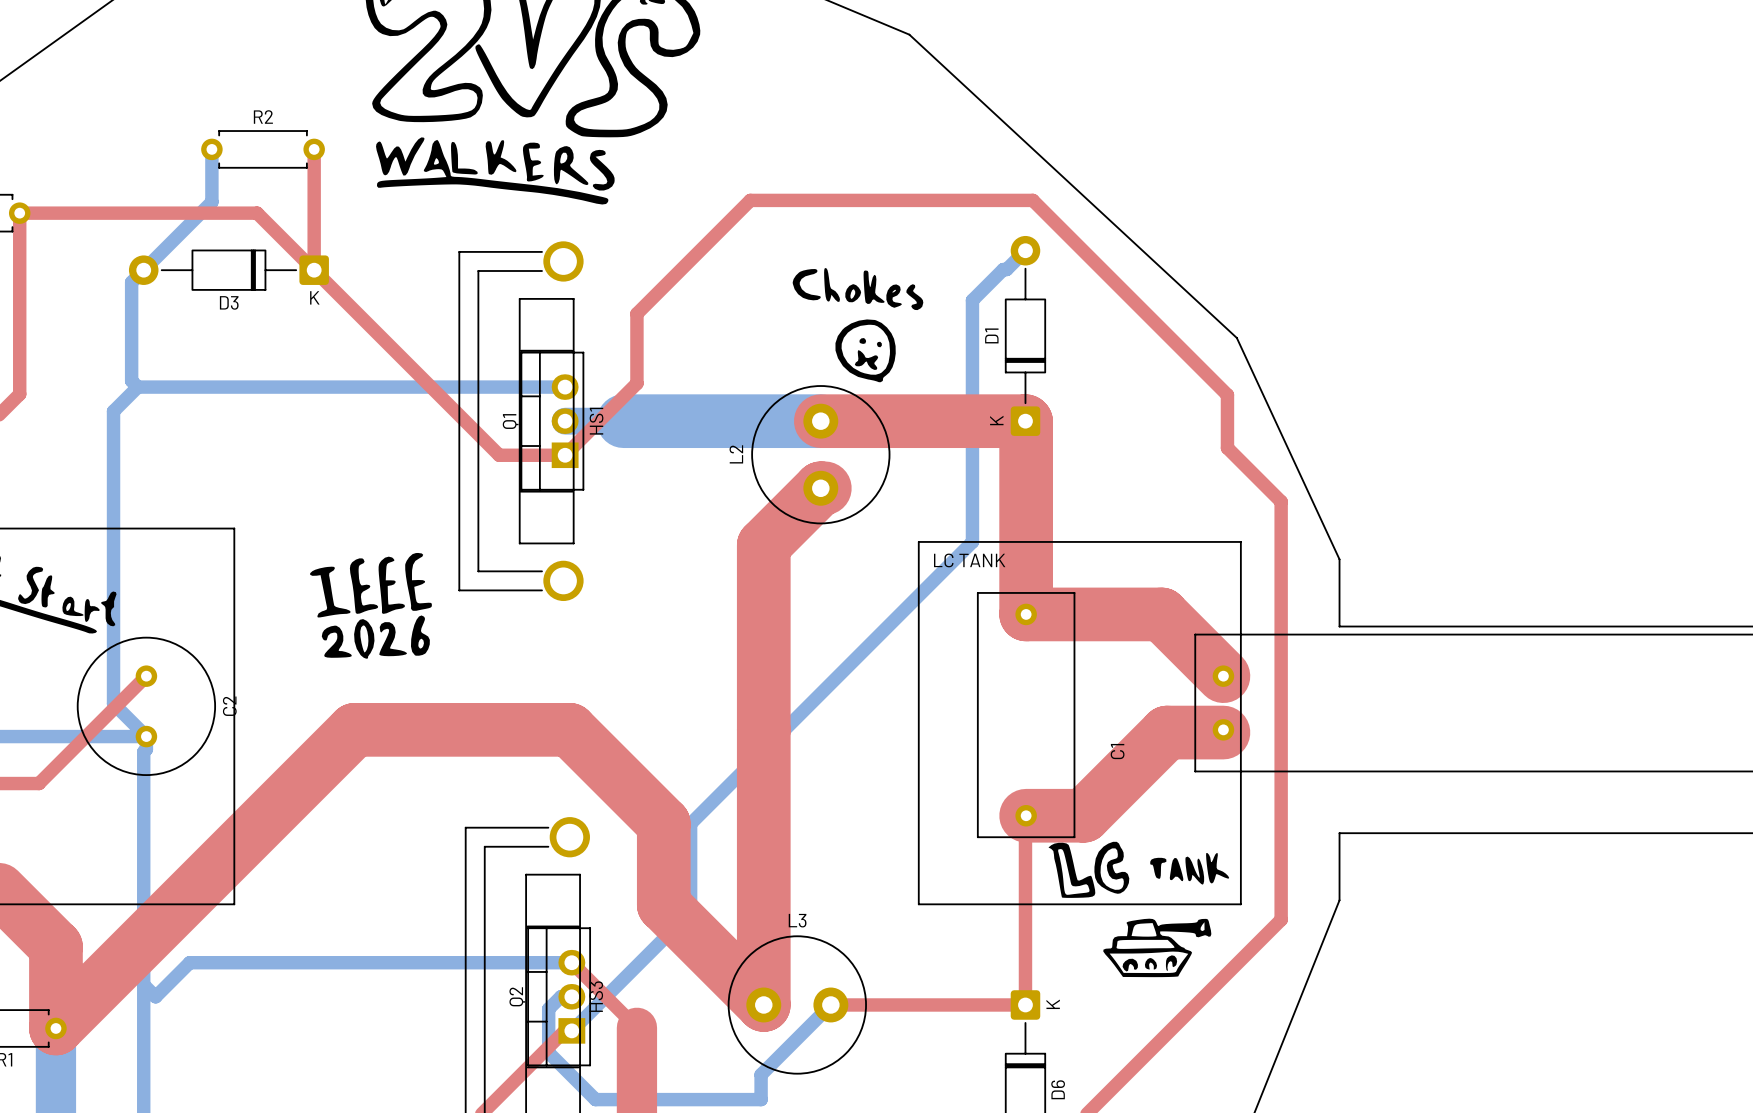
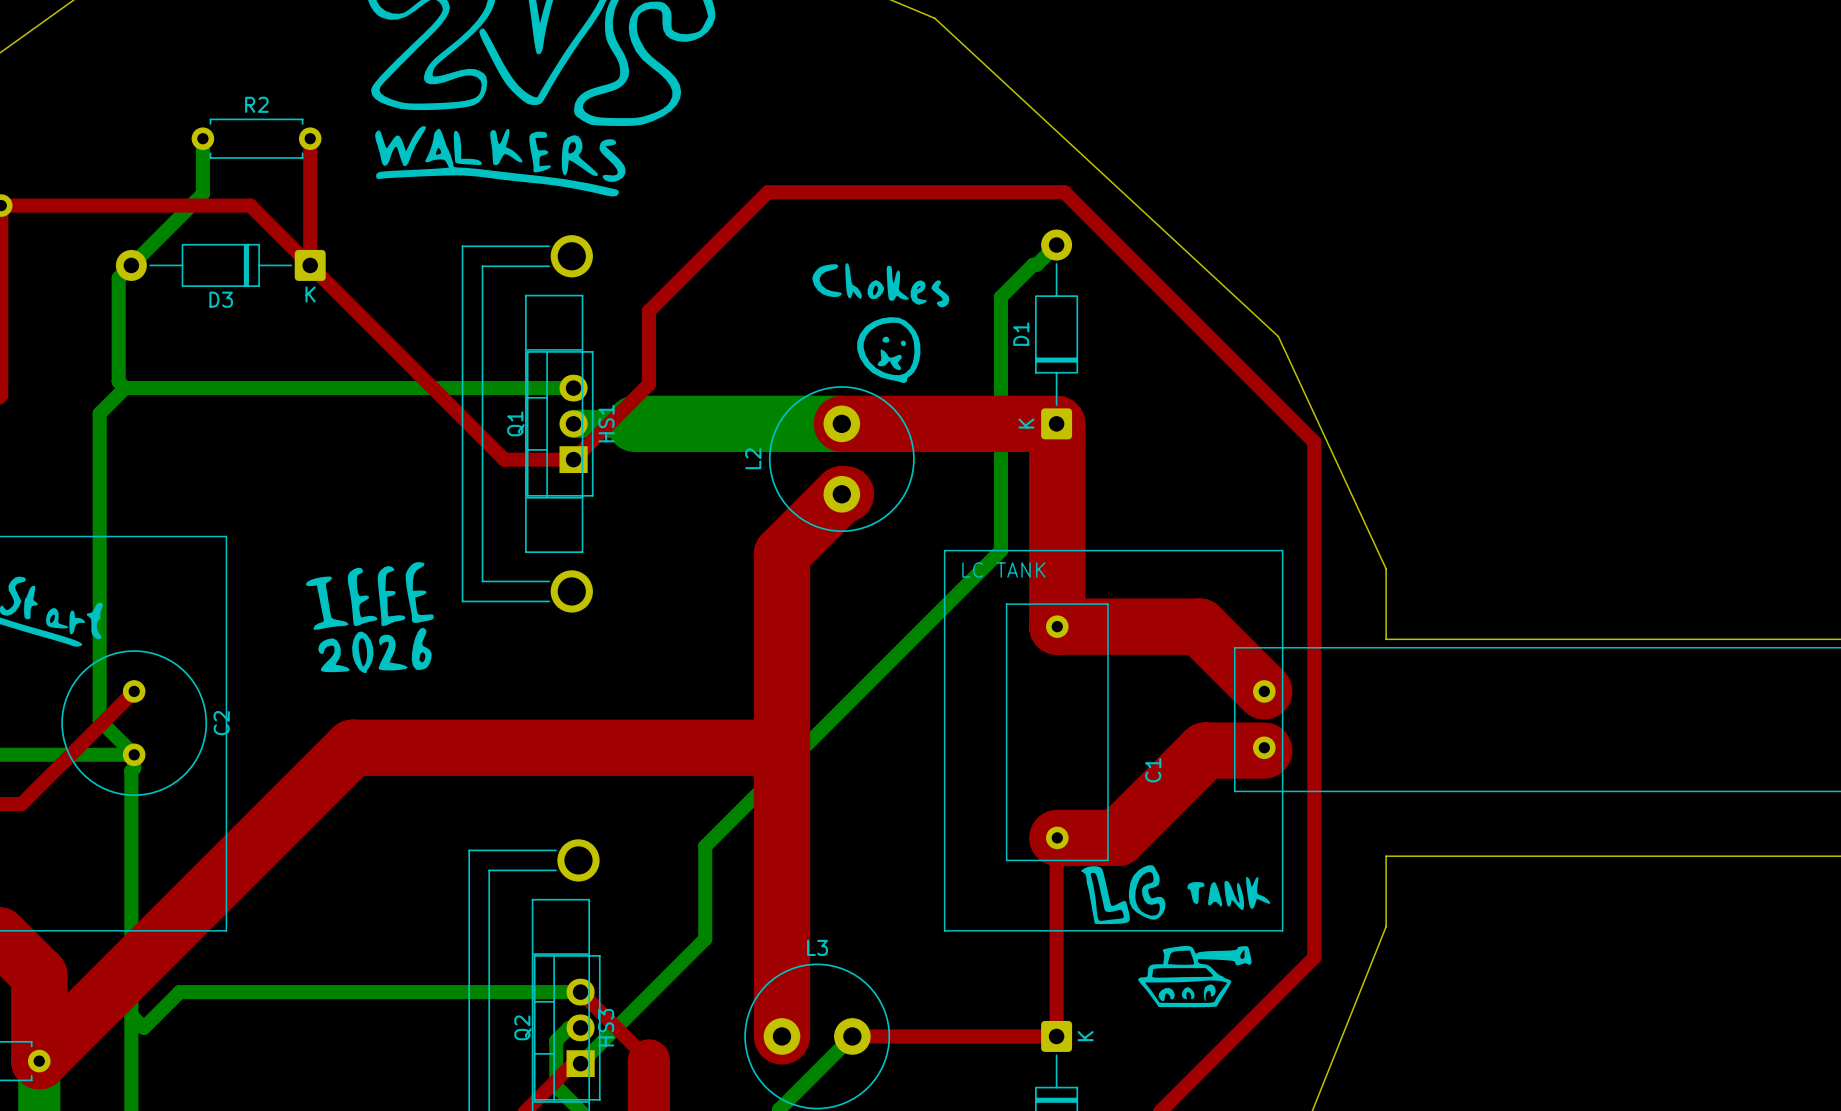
top track: (1227, 395) (1227, 448) (1281, 501) (1281, 919) (1271, 929) -> (1268, 396) (1314, 442) (1314, 957)
top track: (569, 729) (663, 823) (663, 904) (763, 1004) -> (578, 747) (781, 747)

